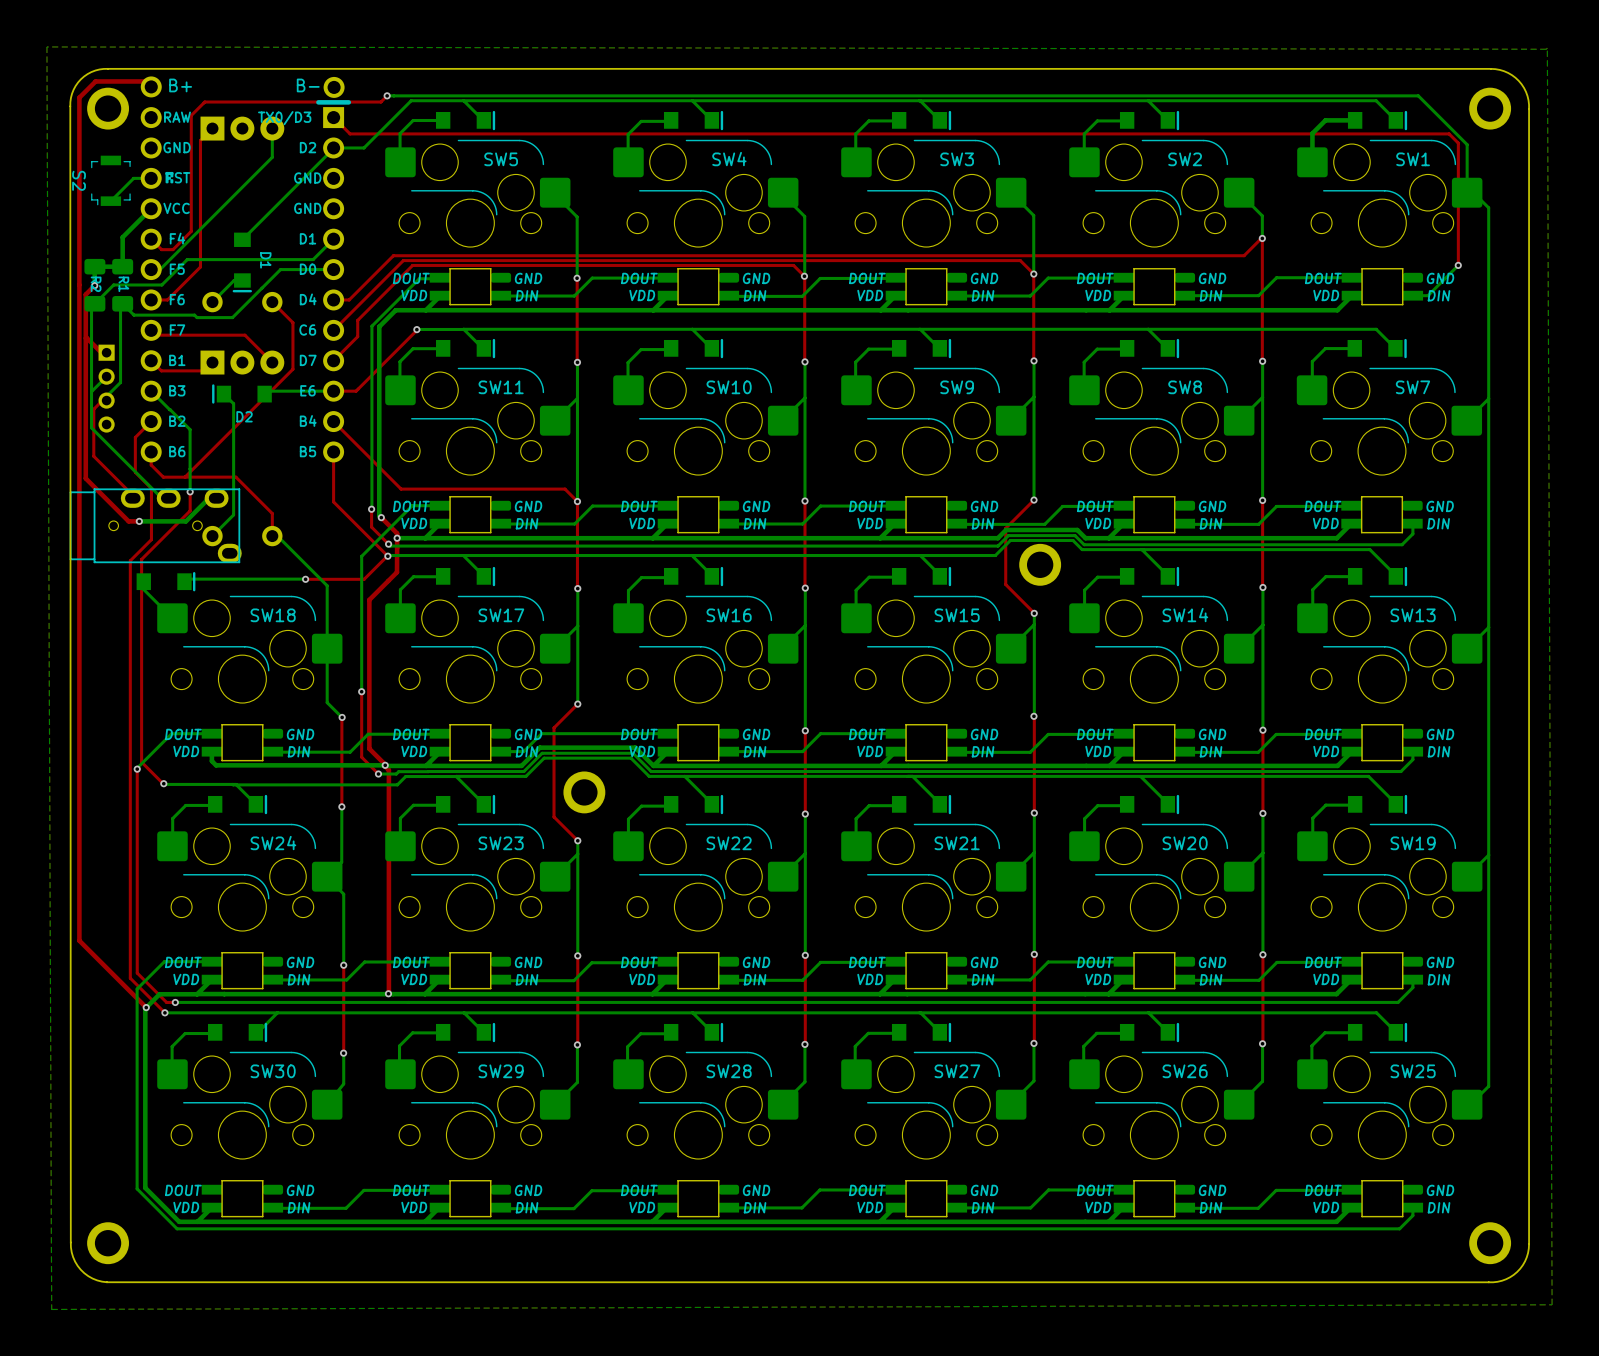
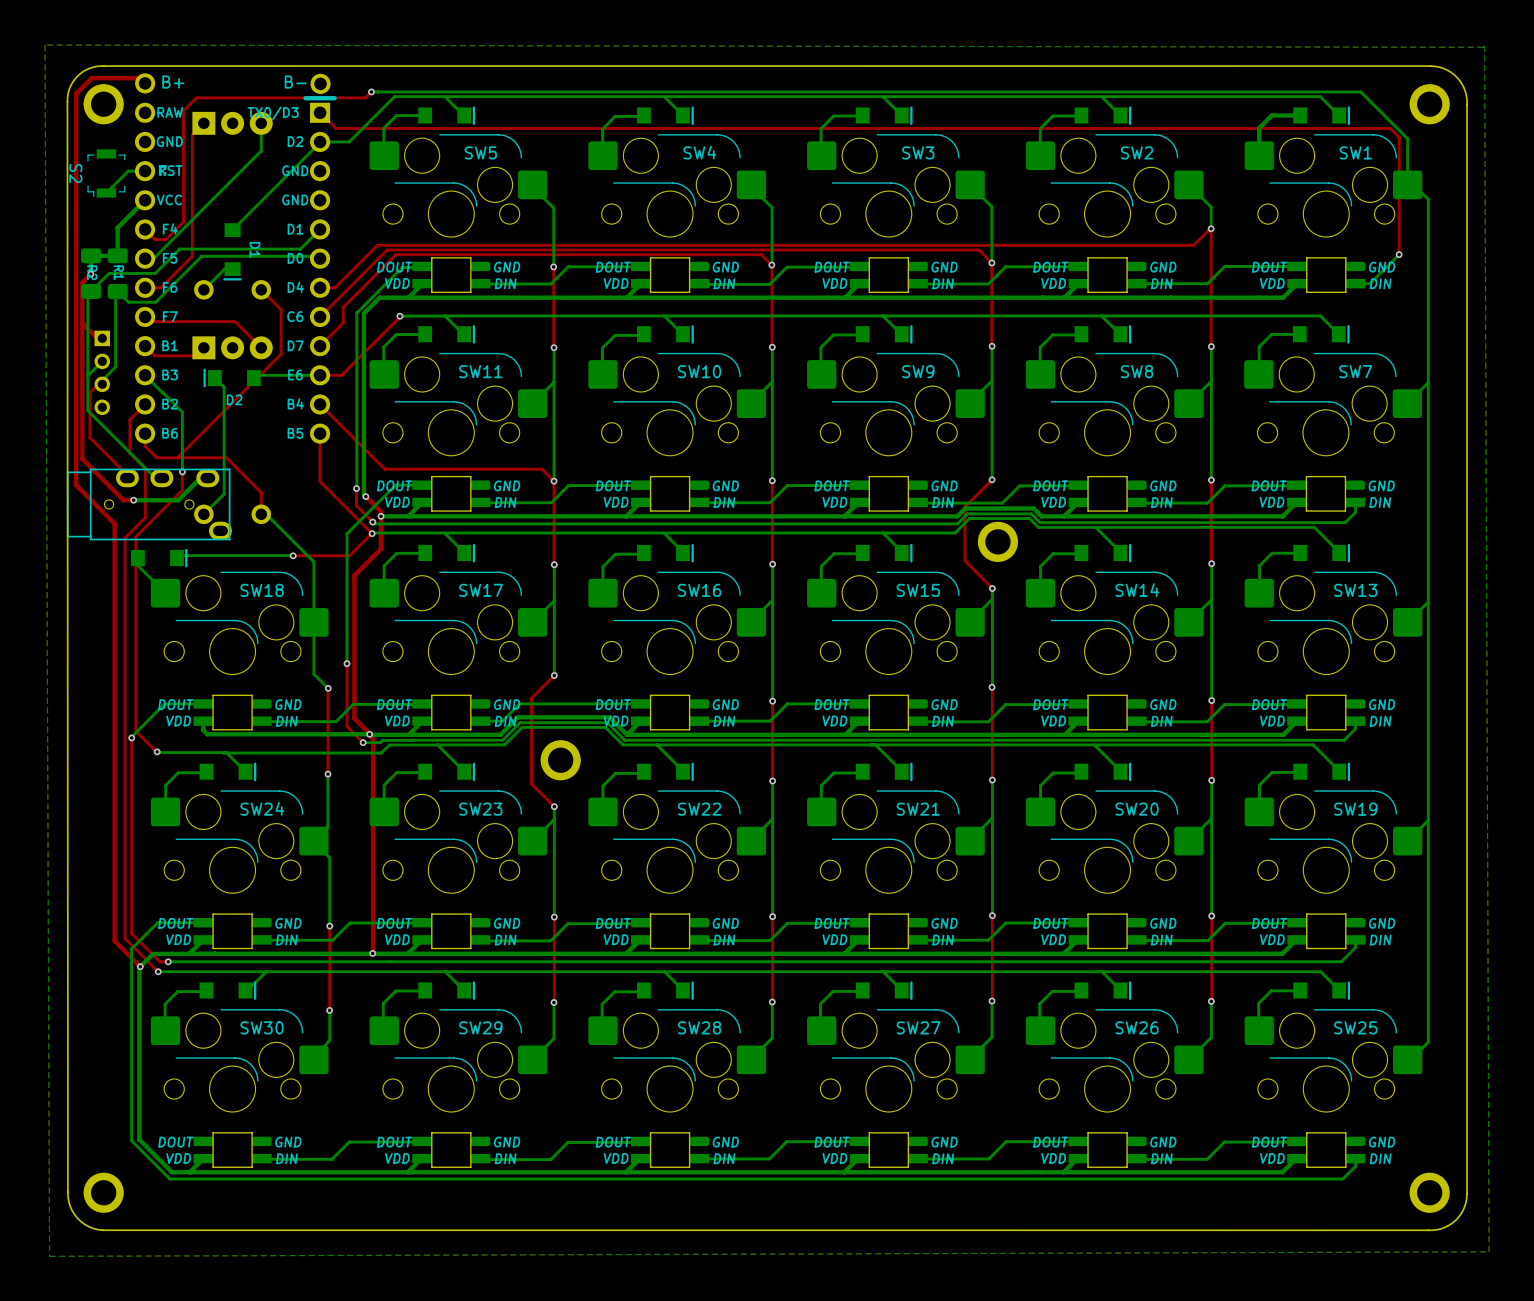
bottom track: (333, 269) (280, 269) (232, 317) (133, 314) -> (320, 258) (317, 256) (201, 256) (155, 302) (128, 302)
top track: (79, 505) (79, 940) (119, 980) -> (76, 485) (114, 523) (114, 941)

